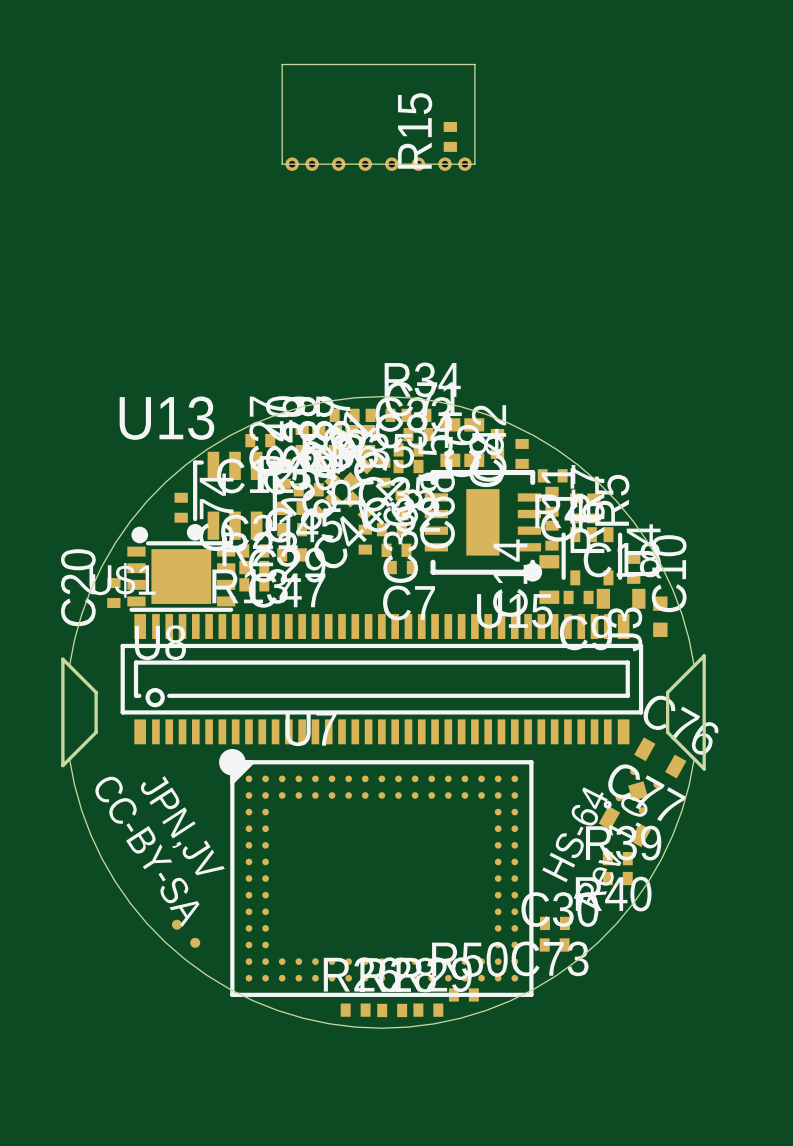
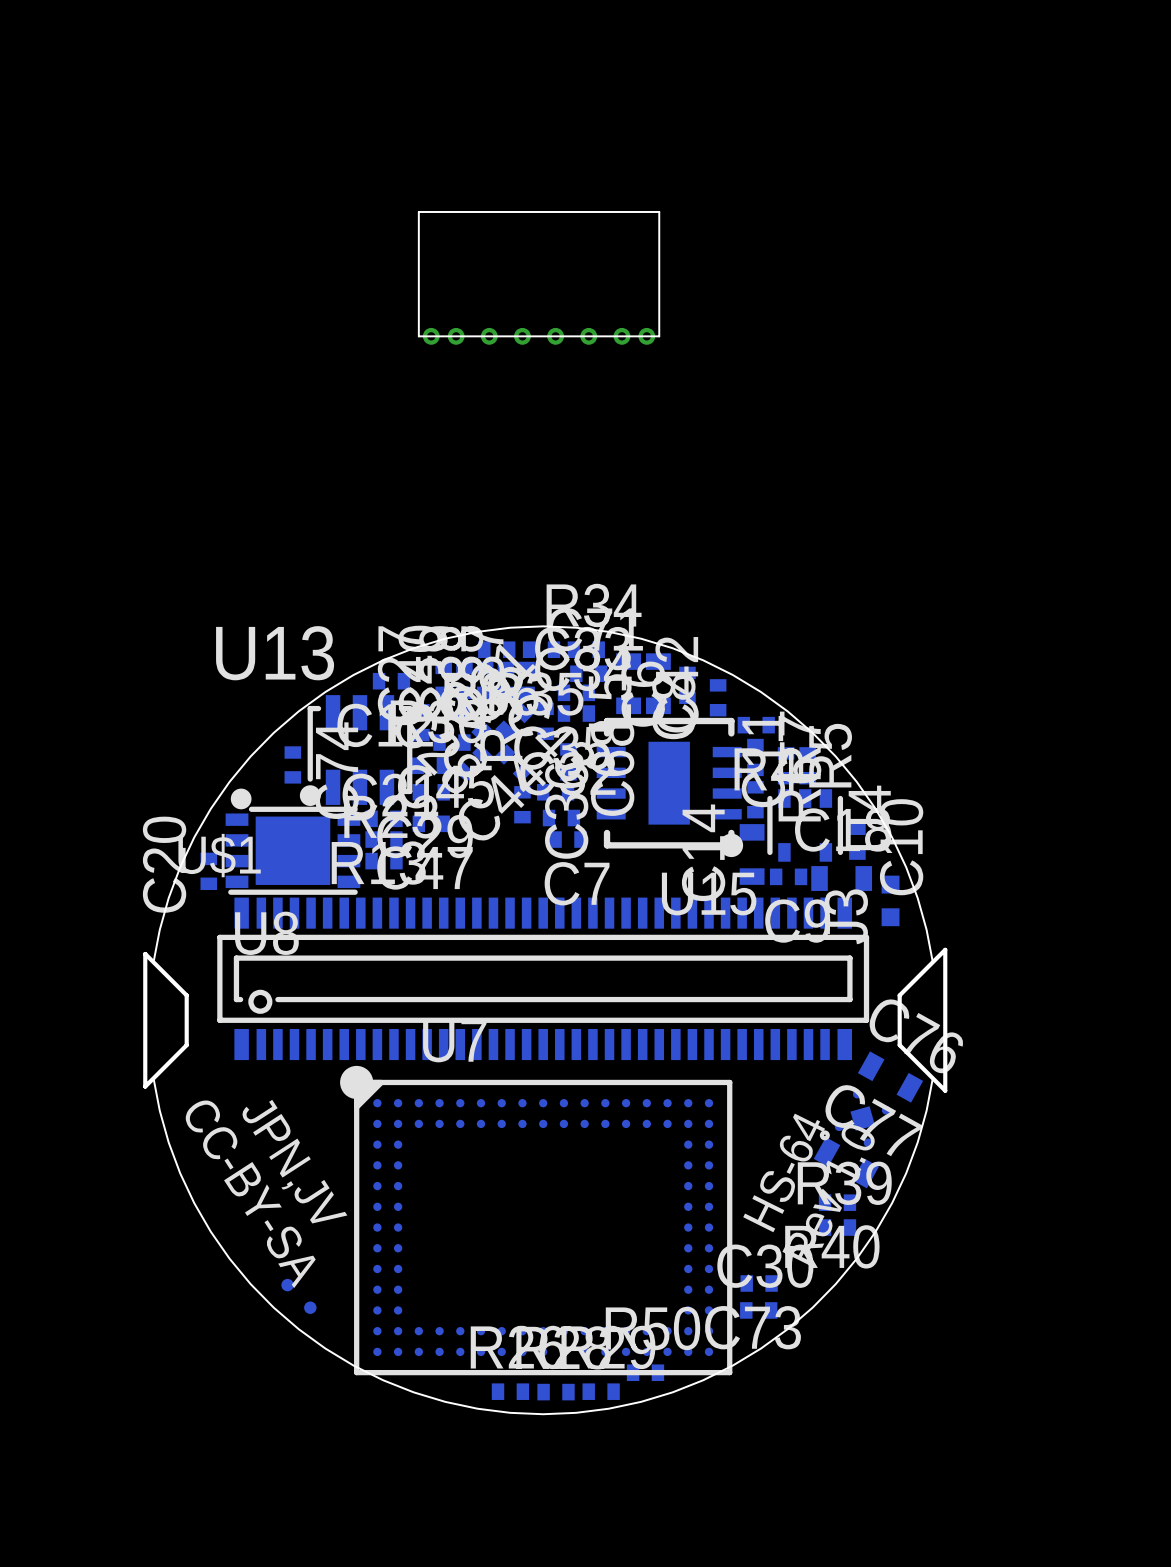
R15: (450, 136) -> none

